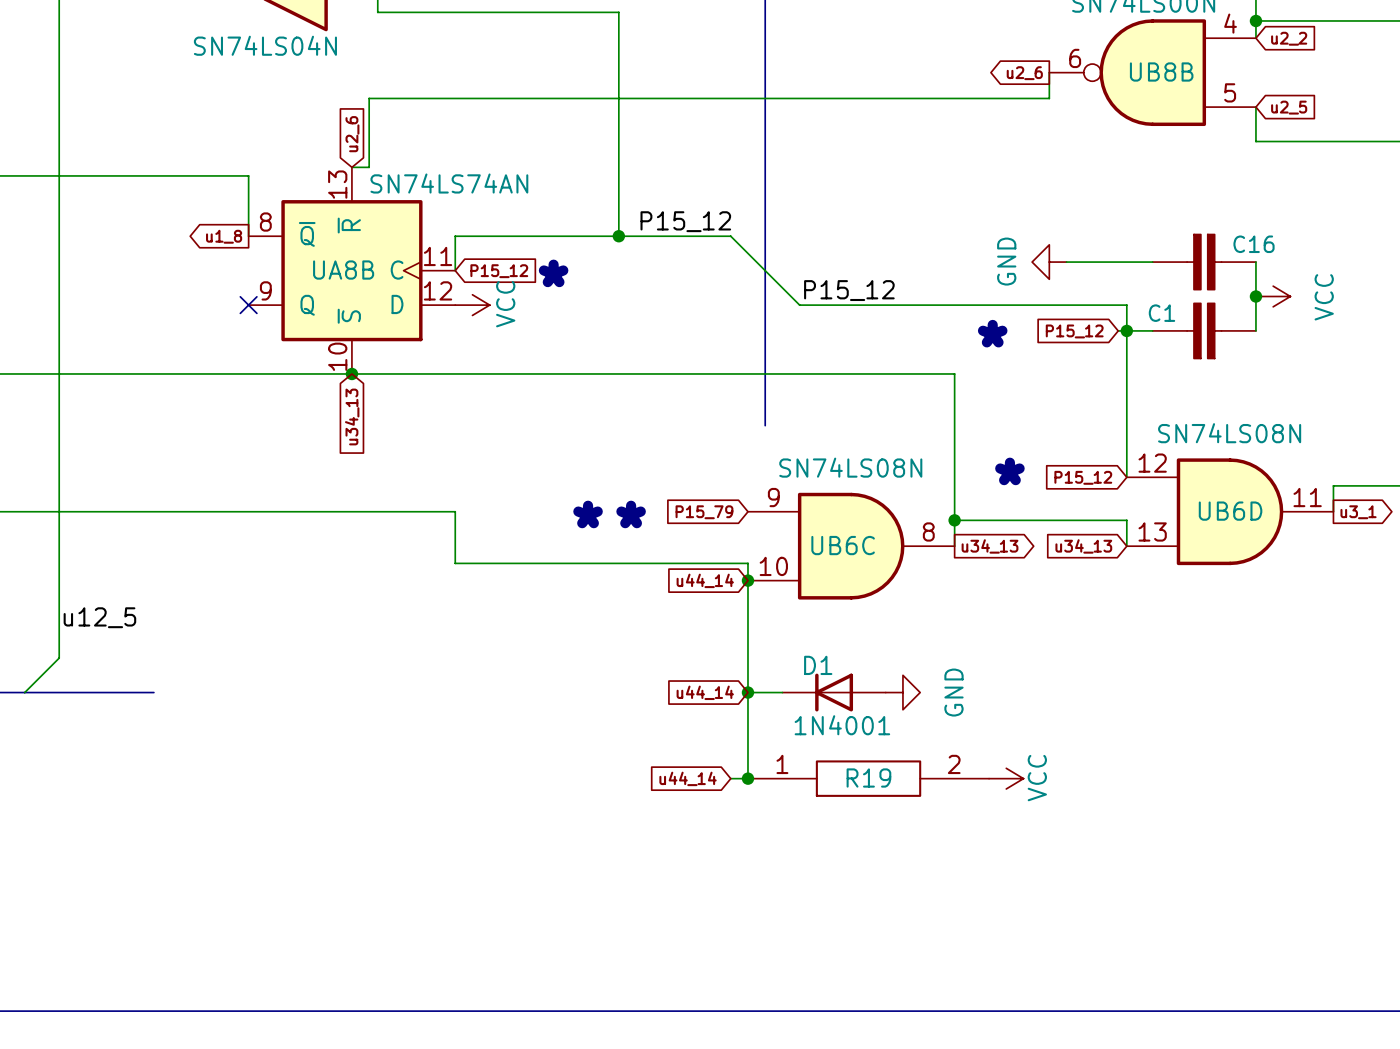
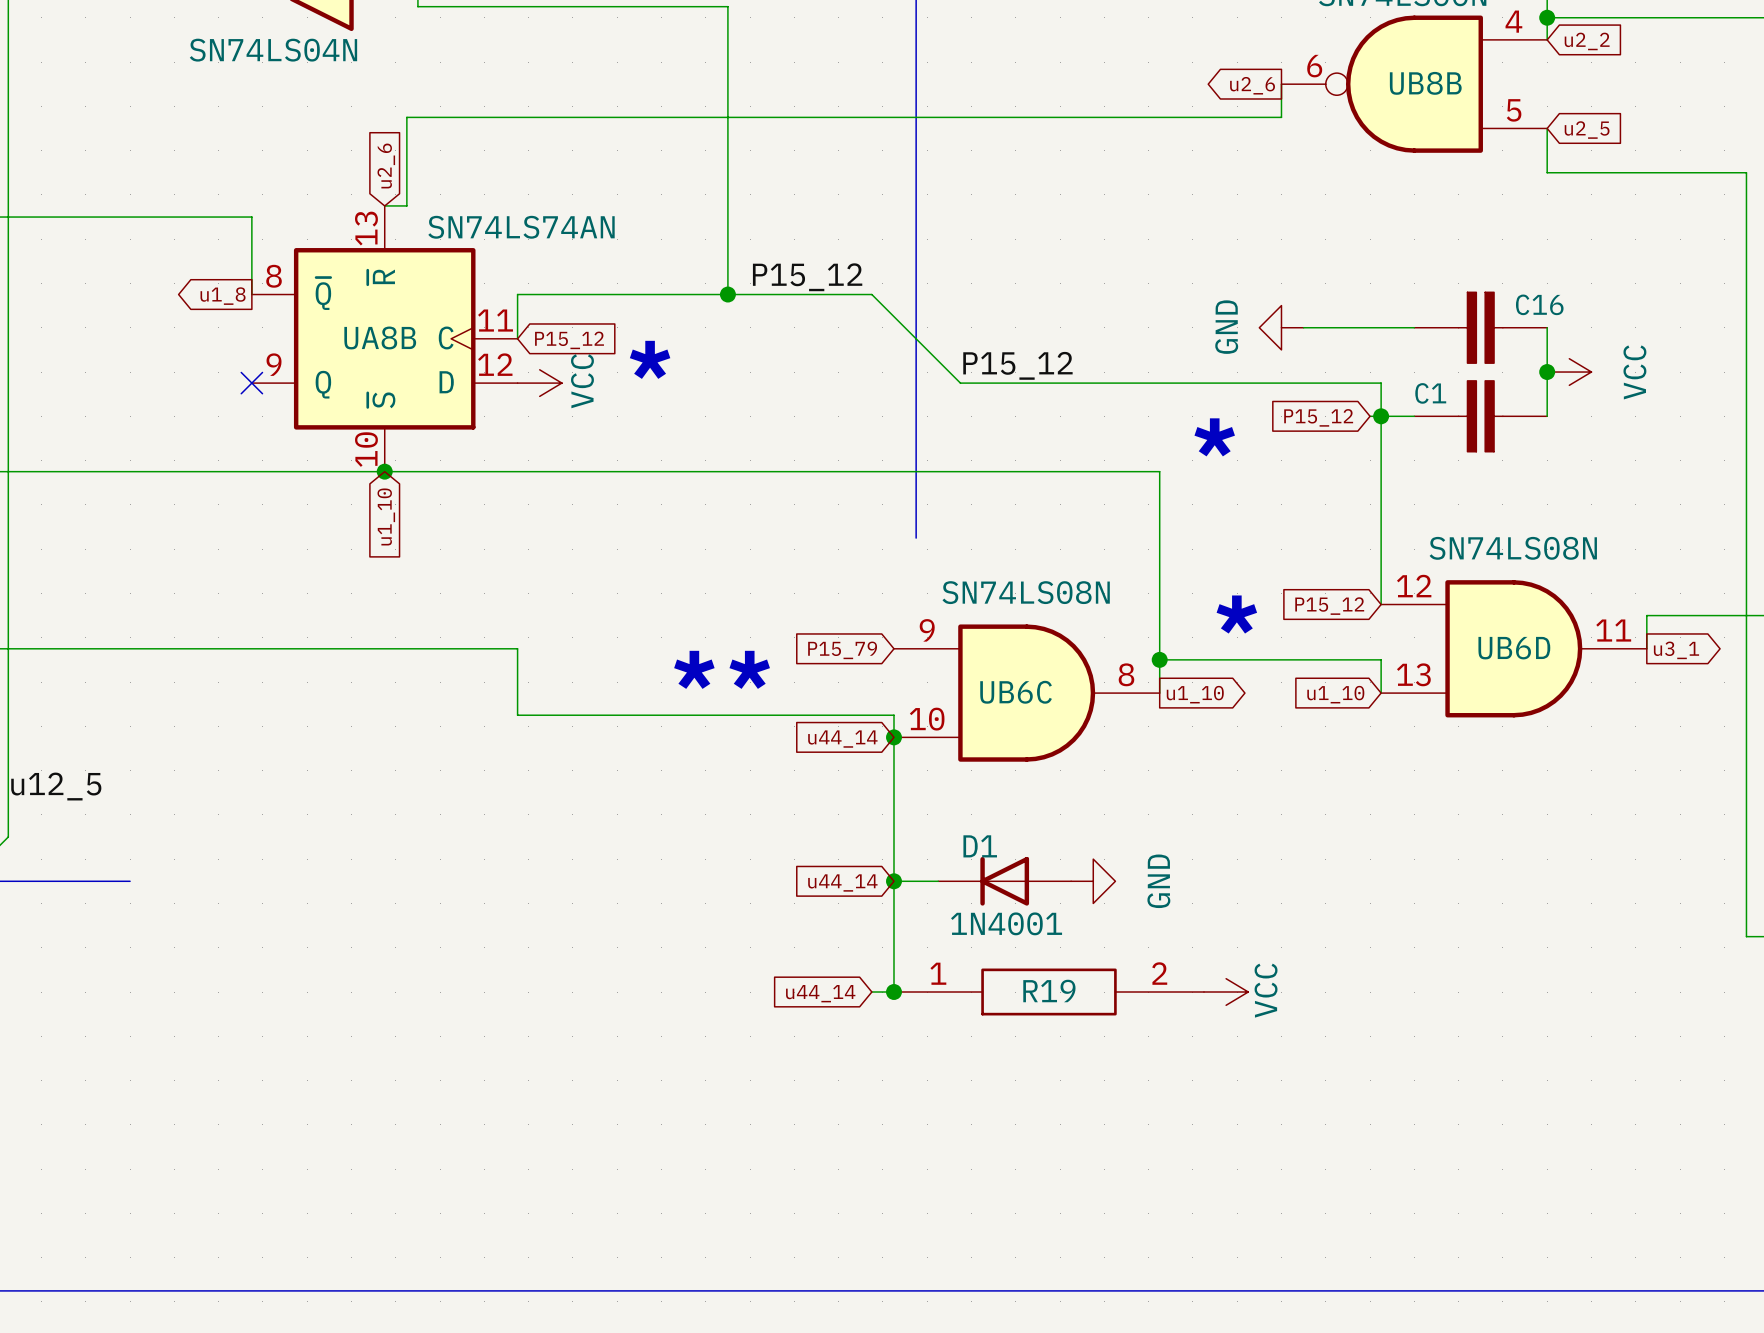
global label: u34_13 (352, 416) -> u1_10 (386, 516)
global label: u34_13 (990, 546) -> u1_10 (1195, 694)
global label: u34_13 (1083, 546) -> u1_10 (1335, 694)

